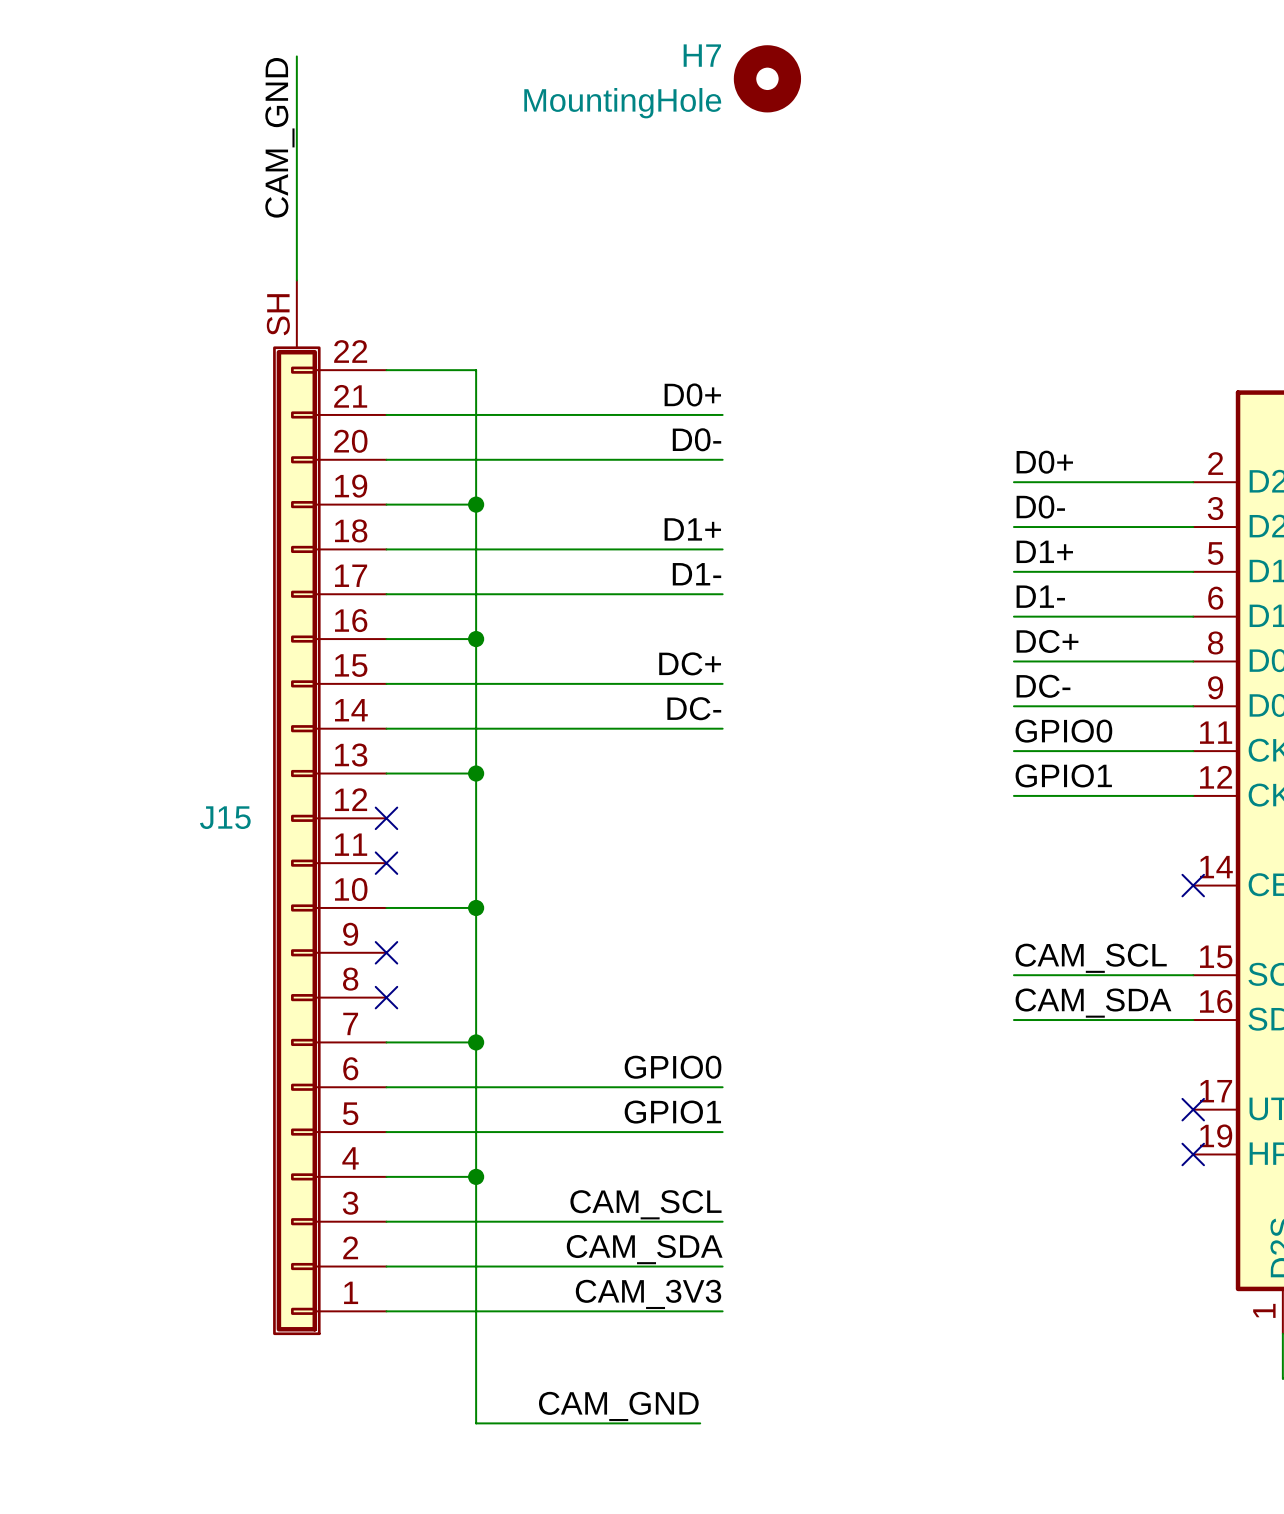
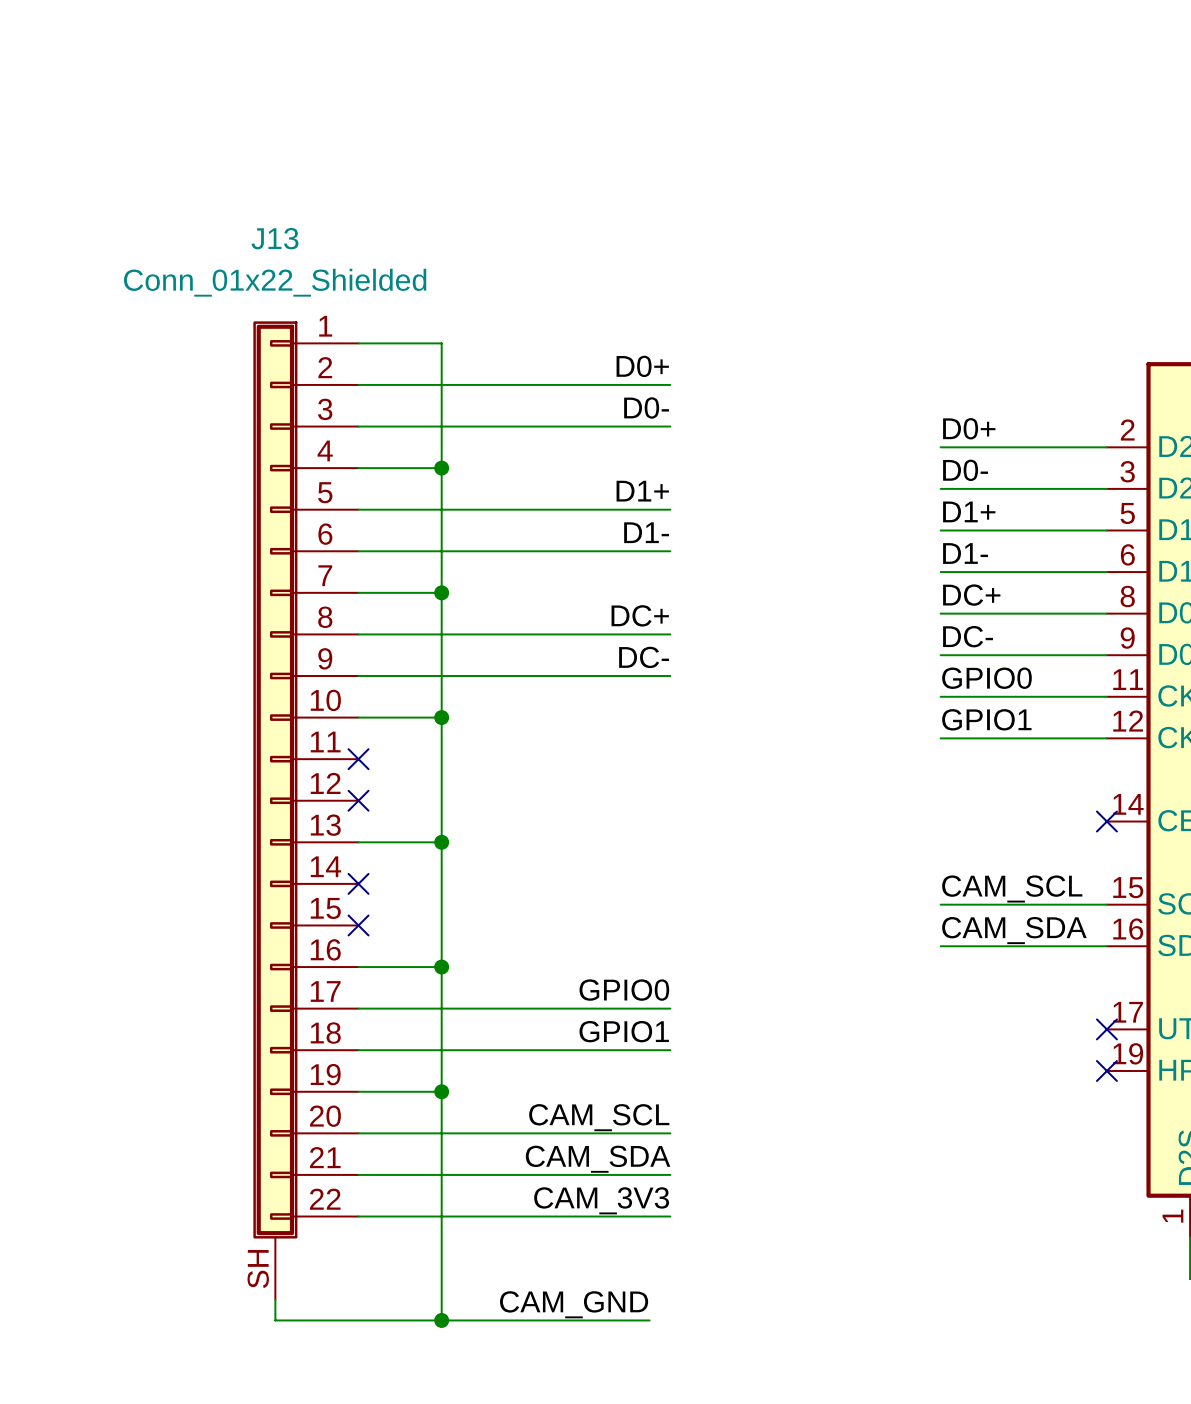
wire: (296, 56) (296, 280) -> none
H7: MountingHole (767, 78) -> none
label: CAM_GND (279, 137) -> none
J15: (329, 807) -> none
J13: none -> Conn_01x22_Shielded (305, 810)
wire: none -> (275, 1299) (275, 1320) (441, 1320)
junction: none -> (441, 1320)

